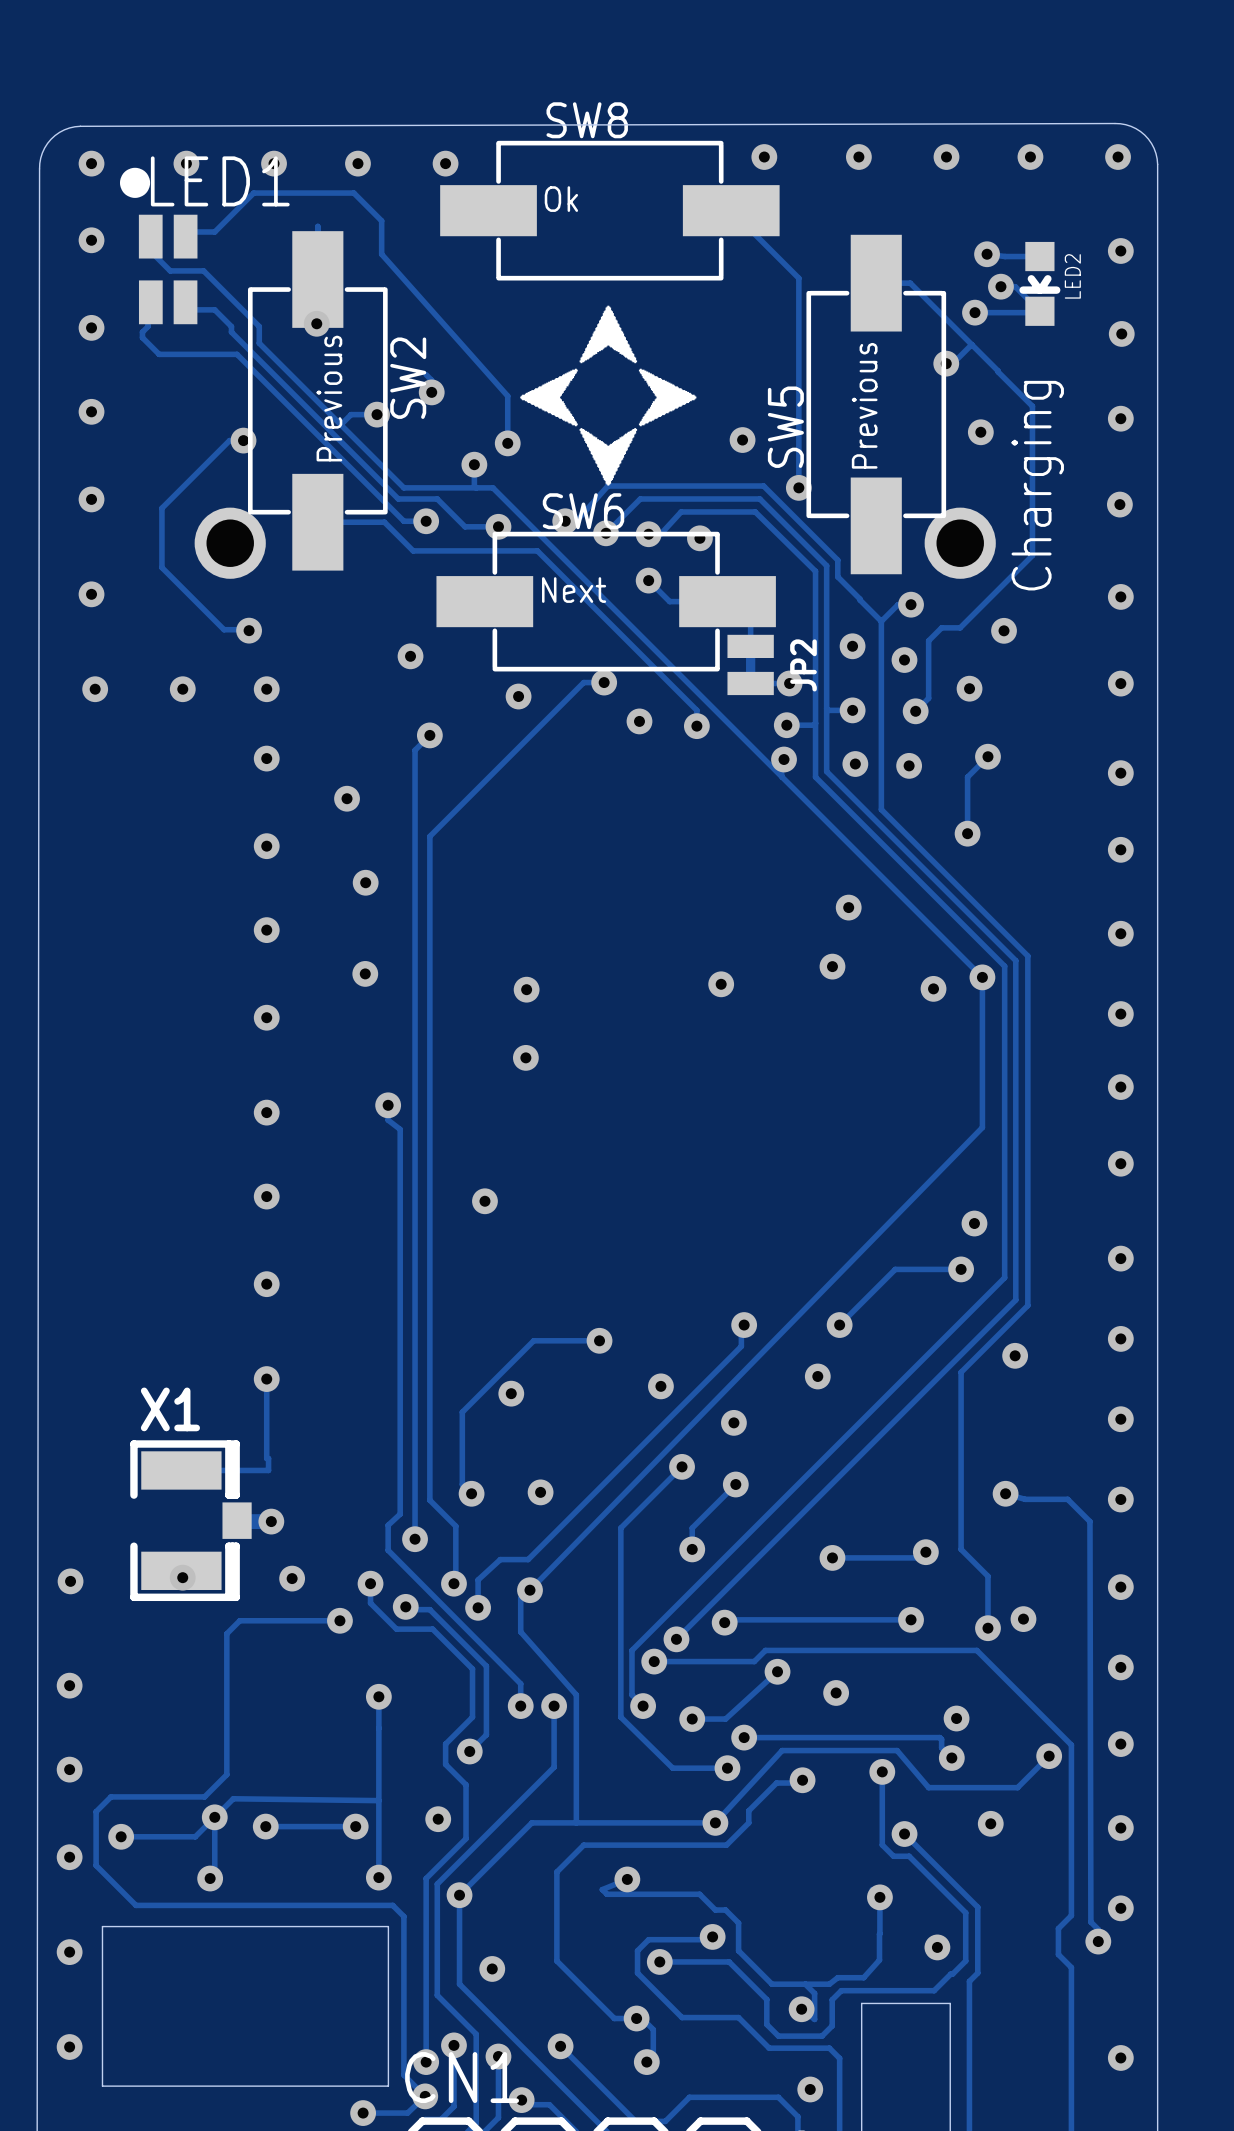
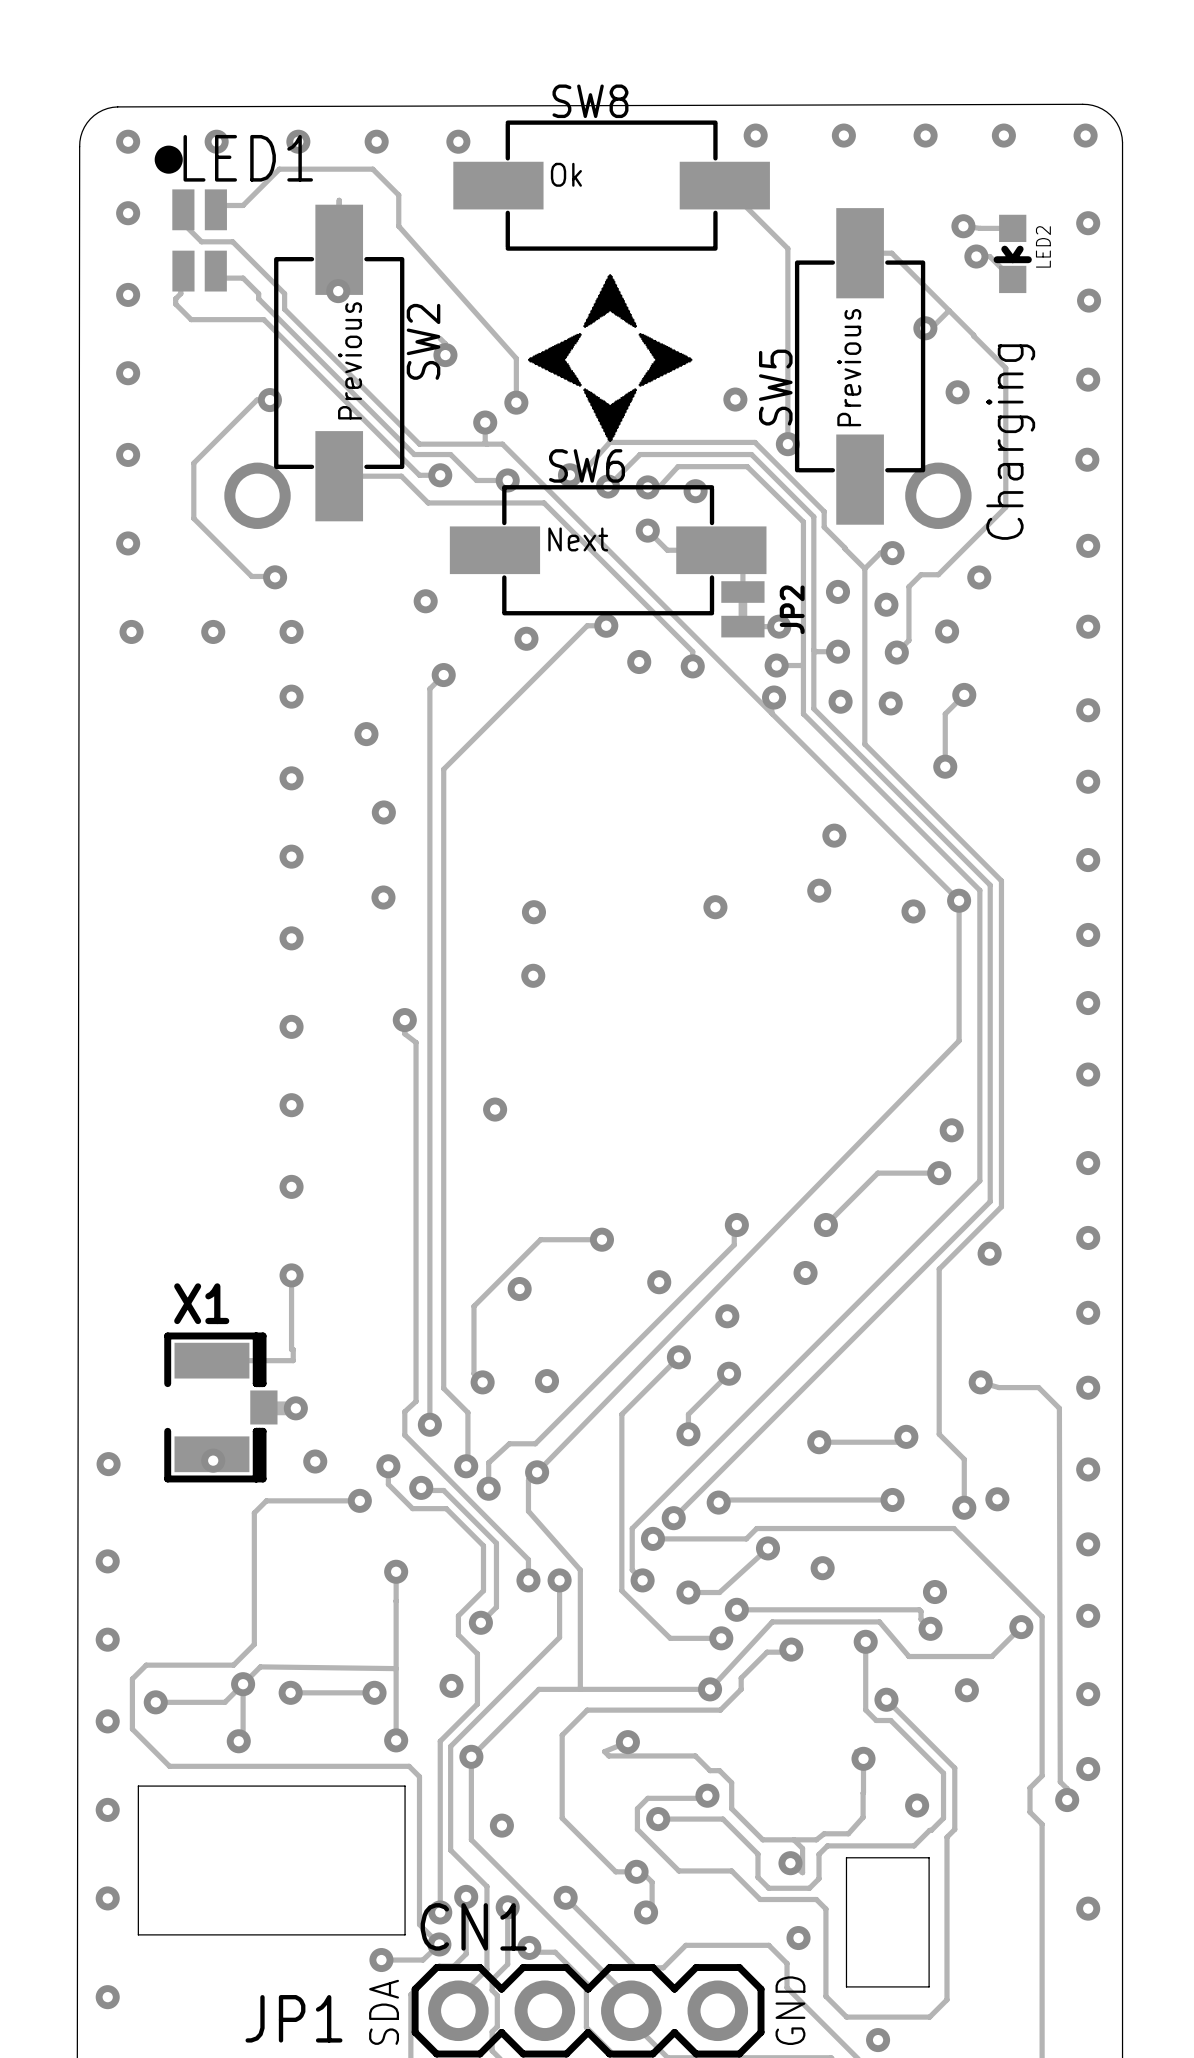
track: (975, 312) (1038, 312) -> none
via: (975, 312) -> none
track: (377, 414) (351, 414) (340, 424) -> none
via: (377, 414) -> none

